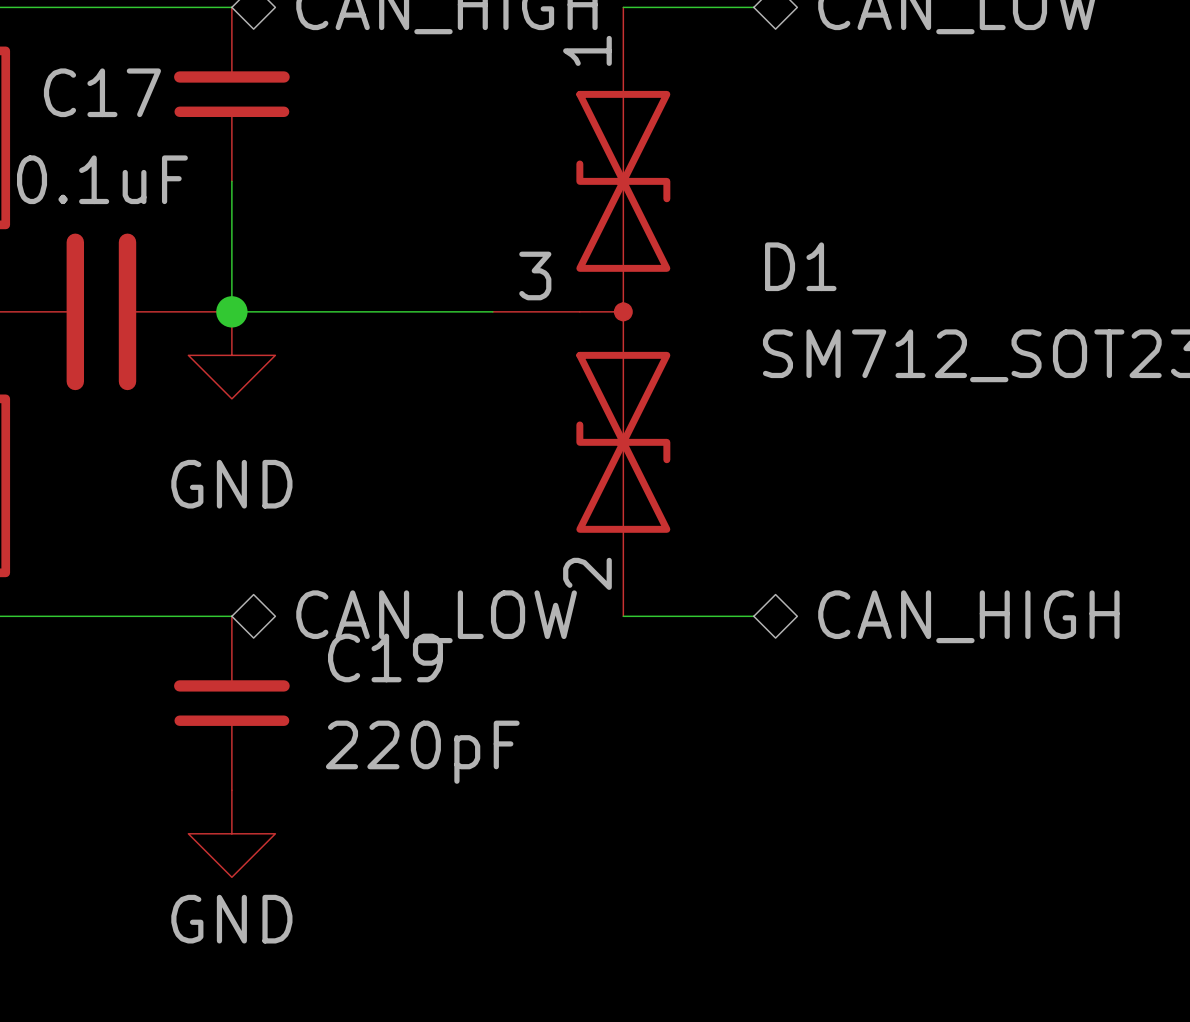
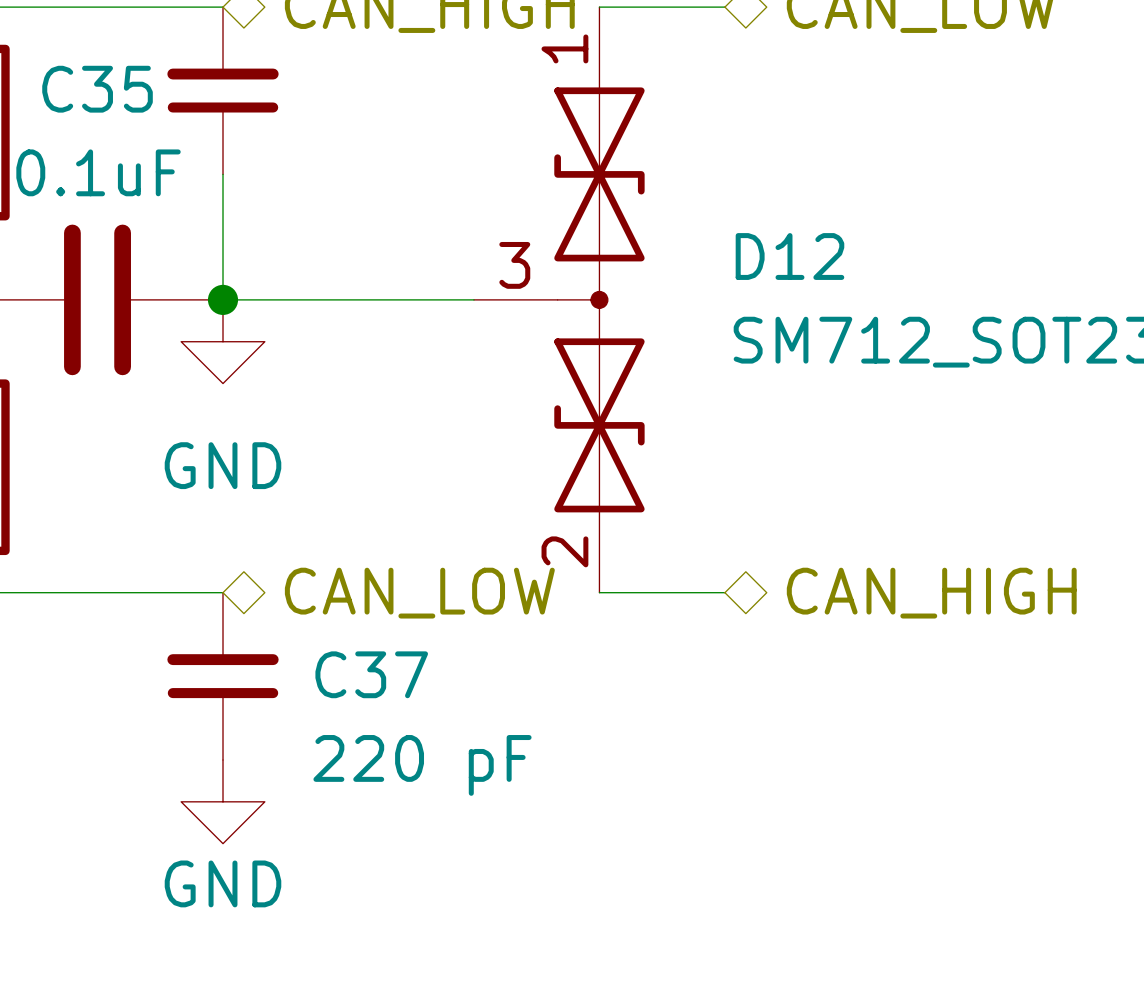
C17 name: C17 (102, 92) -> C35 (97, 89)
D1 name: D1 (800, 266) -> D12 (789, 256)
C19 name: C19 (385, 657) -> C37 (371, 674)
C19 value: 220pF (422, 752) -> 220 pF (422, 765)

